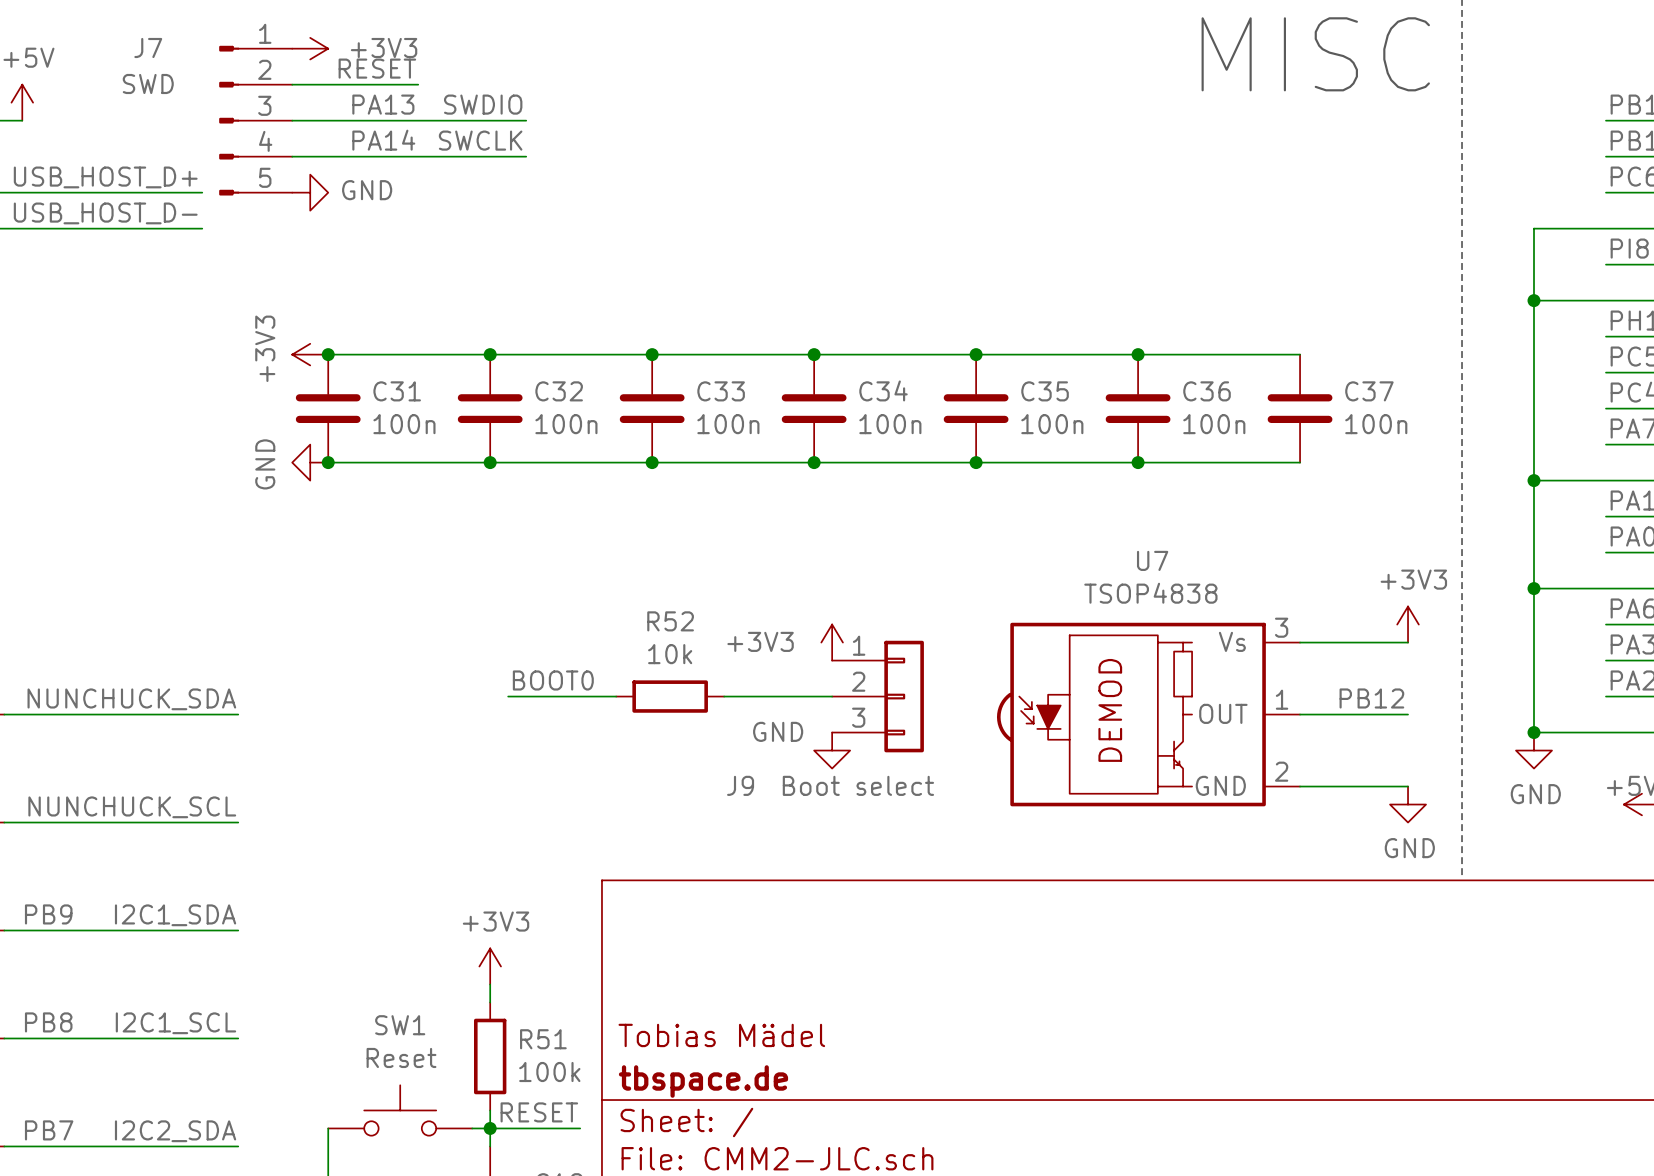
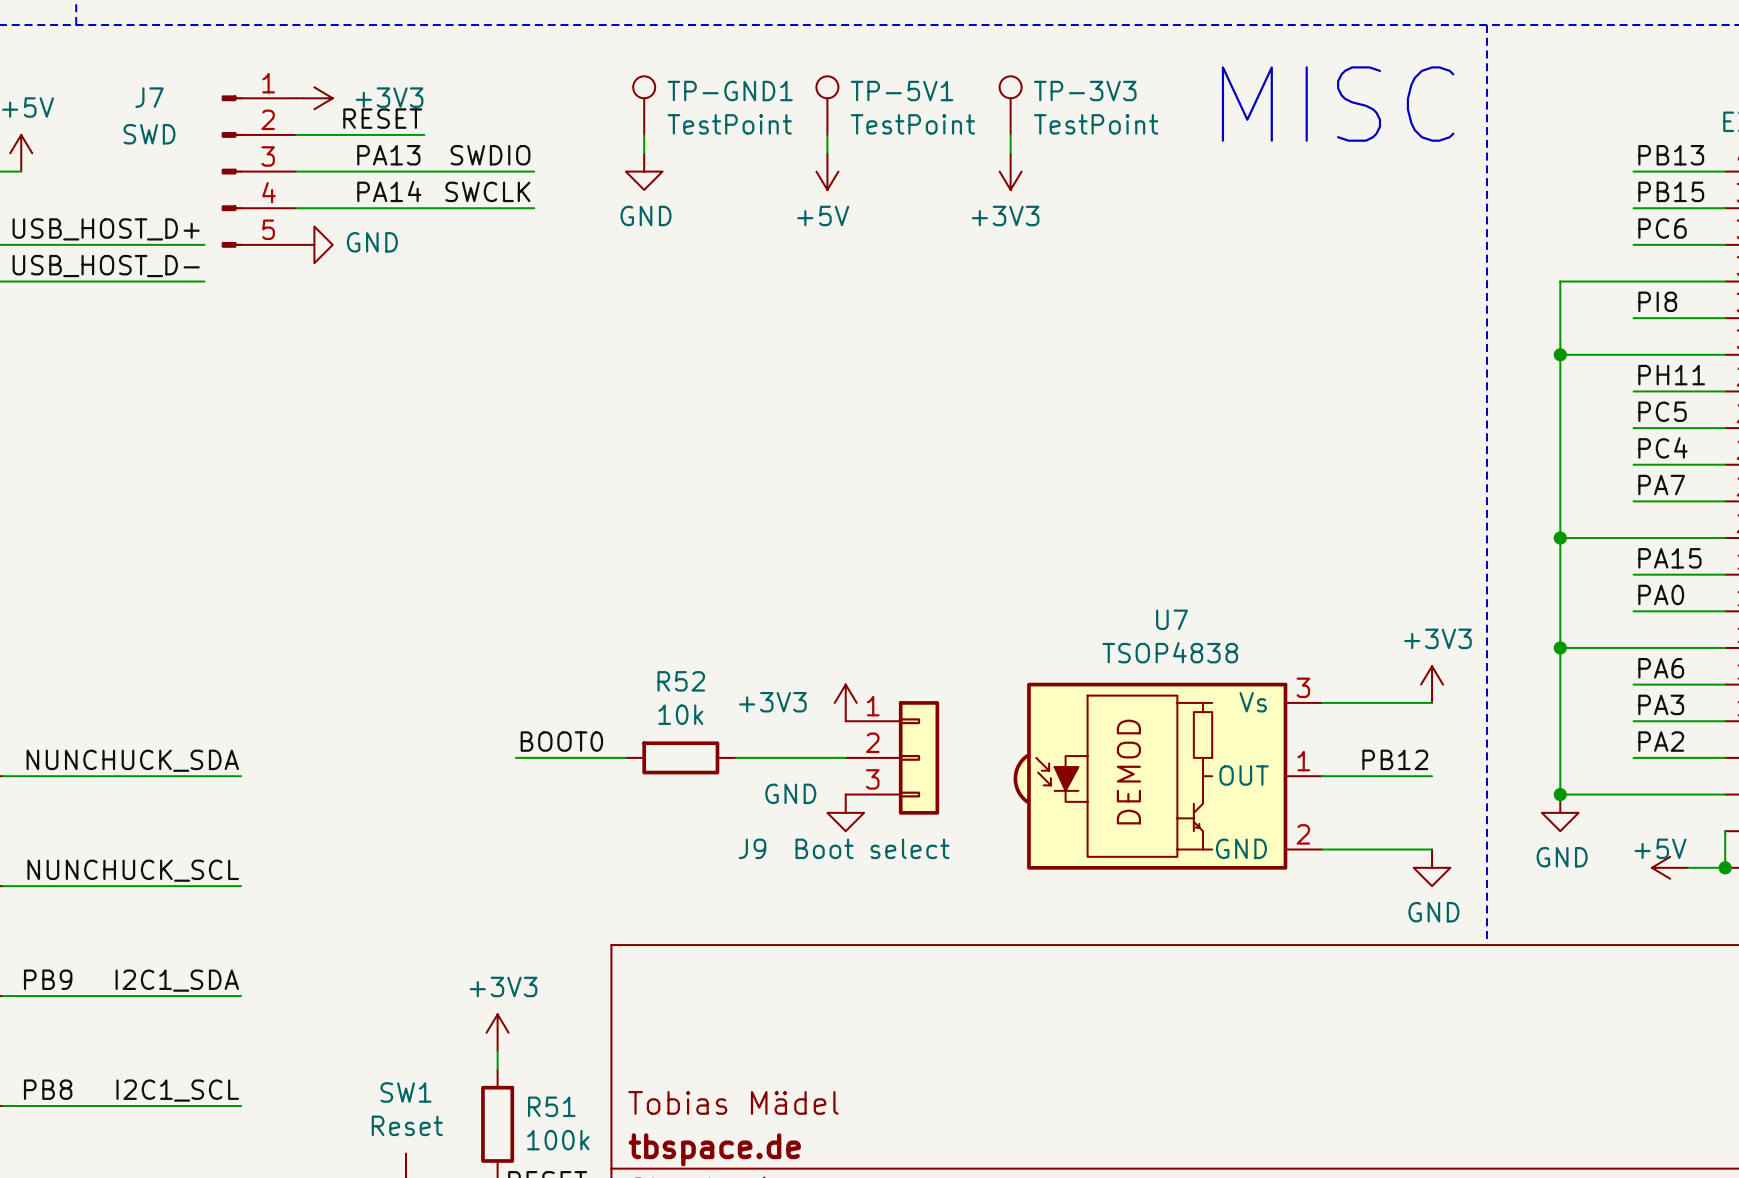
TP-GND1: none -> TestPoint (644, 105)
TP-5V1: none -> TestPoint (827, 105)
TP-3V3: none -> TestPoint (1010, 105)
wire: none -> (644, 134) (644, 153)
wire: none -> (827, 134) (827, 153)
wire: none -> (1010, 134) (1010, 153)
power symbol: none -> GND (644, 171)
power symbol: none -> +5V (827, 171)
power symbol: none -> +3V3 (1010, 171)
power symbol: +3V3 (310, 354) -> none
wire: (328, 354) (1300, 354) -> none
junction: (328, 354) -> none
junction: (490, 354) -> none
junction: (652, 354) -> none
junction: (814, 354) -> none
junction: (976, 354) -> none
junction: (1138, 354) -> none
C31: 100n (328, 408) -> none
C32: 100n (490, 408) -> none
C33: 100n (652, 408) -> none
C34: 100n (814, 408) -> none
C35: 100n (976, 408) -> none
C36: 100n (1138, 408) -> none
C37: 100n (1300, 408) -> none
power symbol: GND (310, 462) -> none
wire: (328, 462) (1300, 462) -> none
junction: (328, 462) -> none
junction: (490, 462) -> none
junction: (652, 462) -> none
junction: (814, 462) -> none
junction: (976, 462) -> none
junction: (1138, 462) -> none

